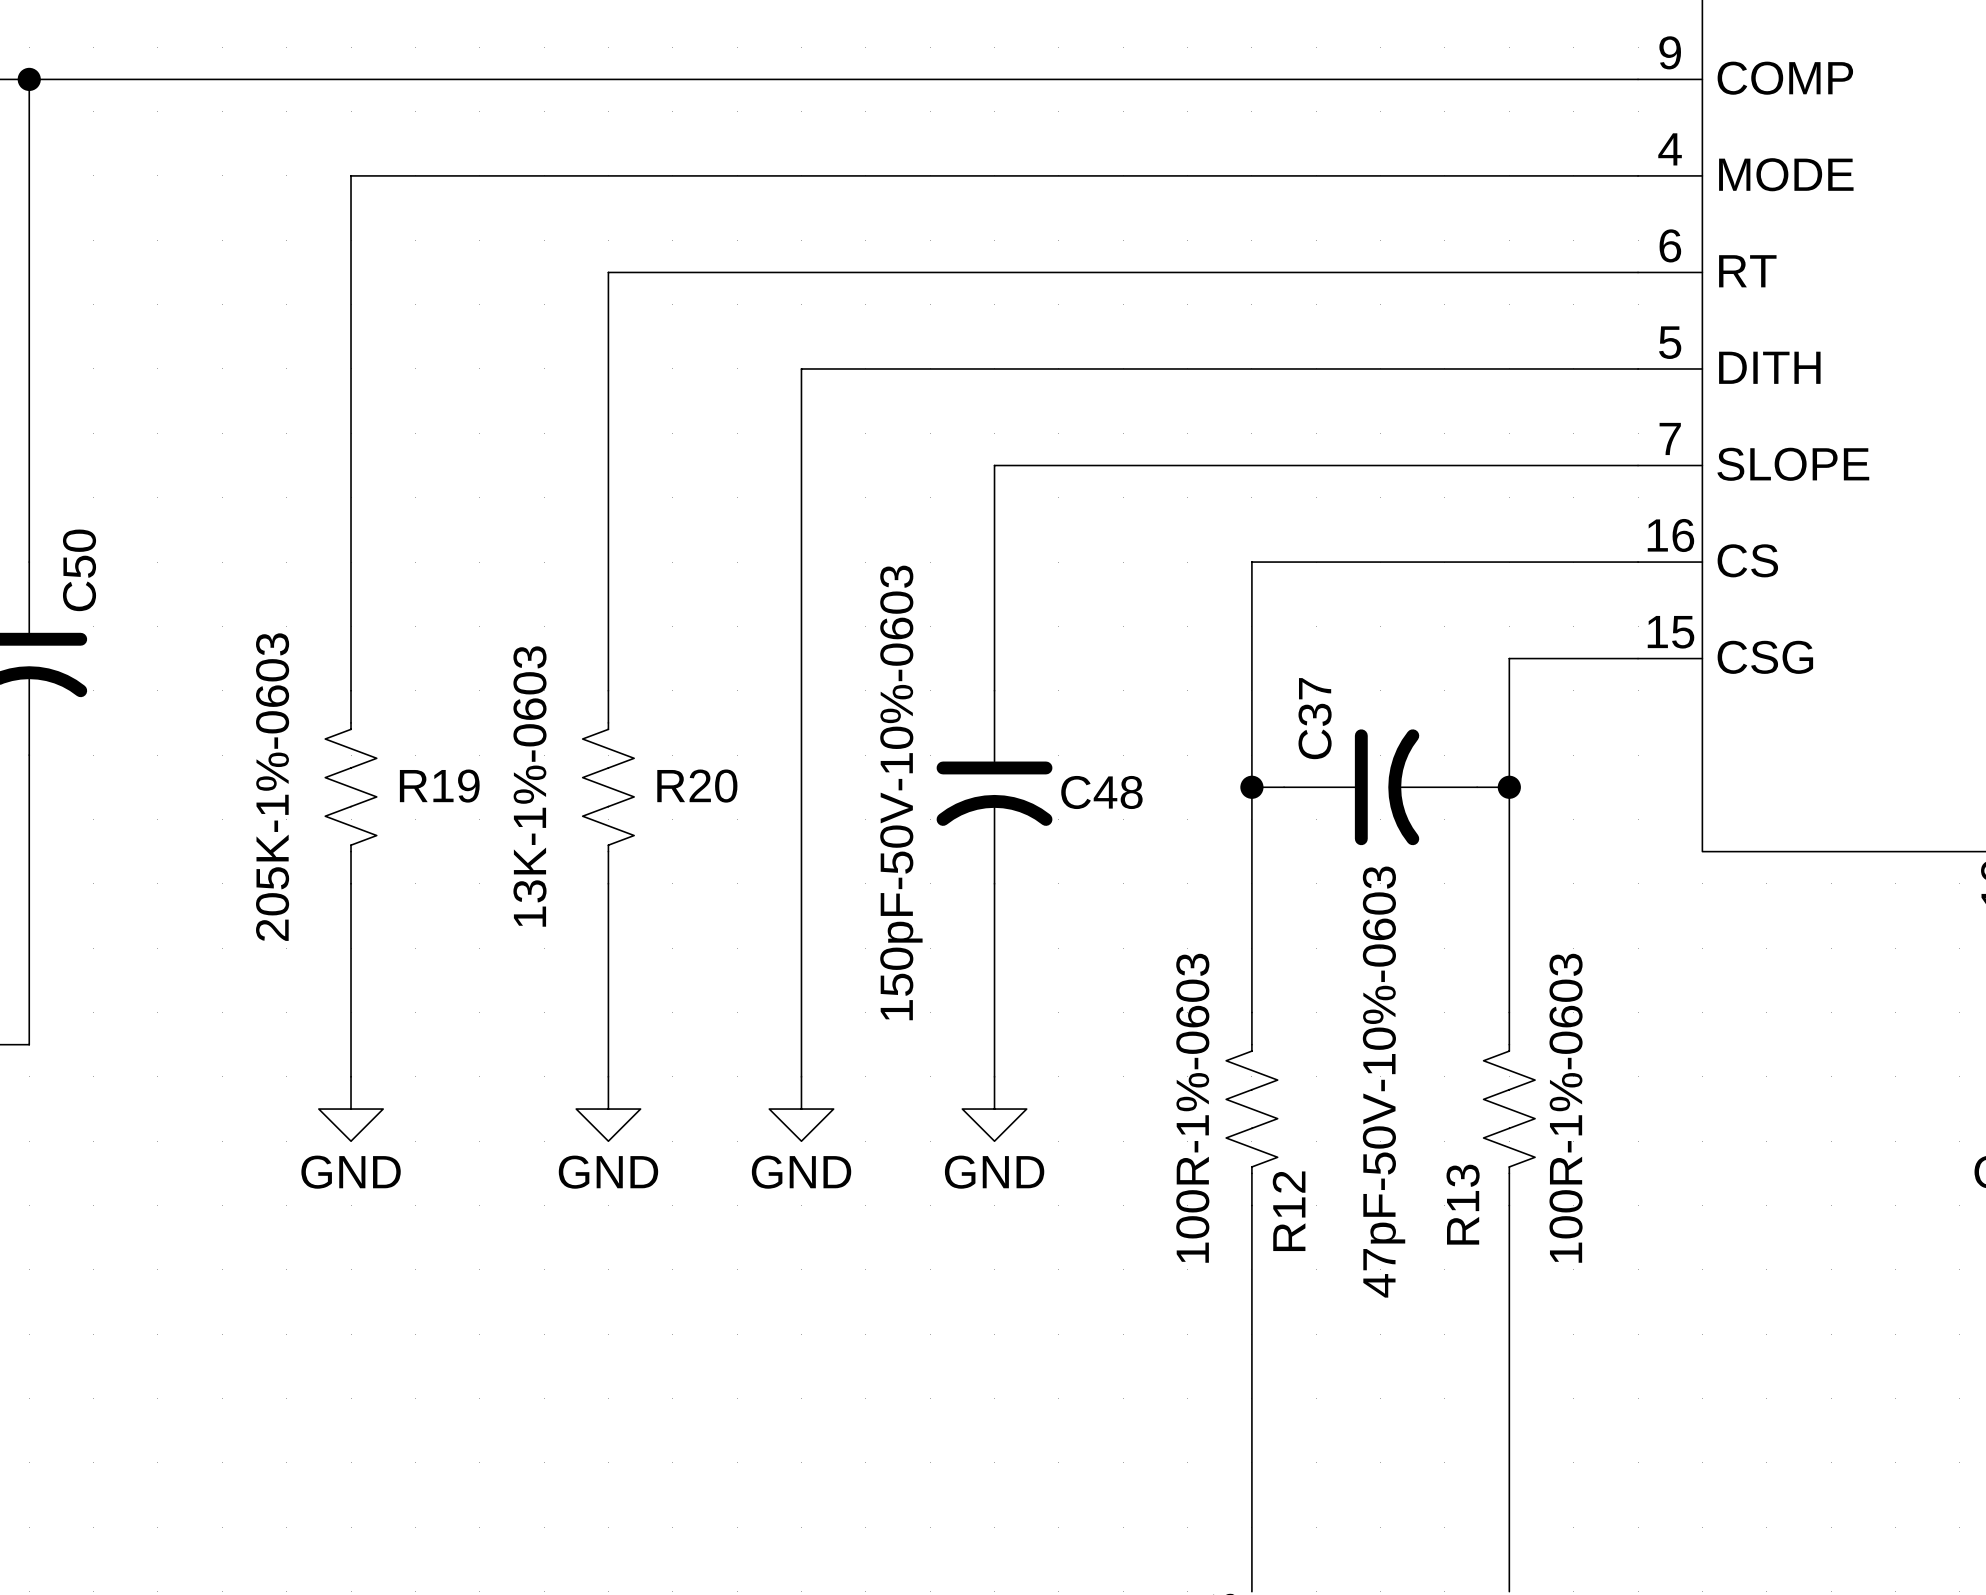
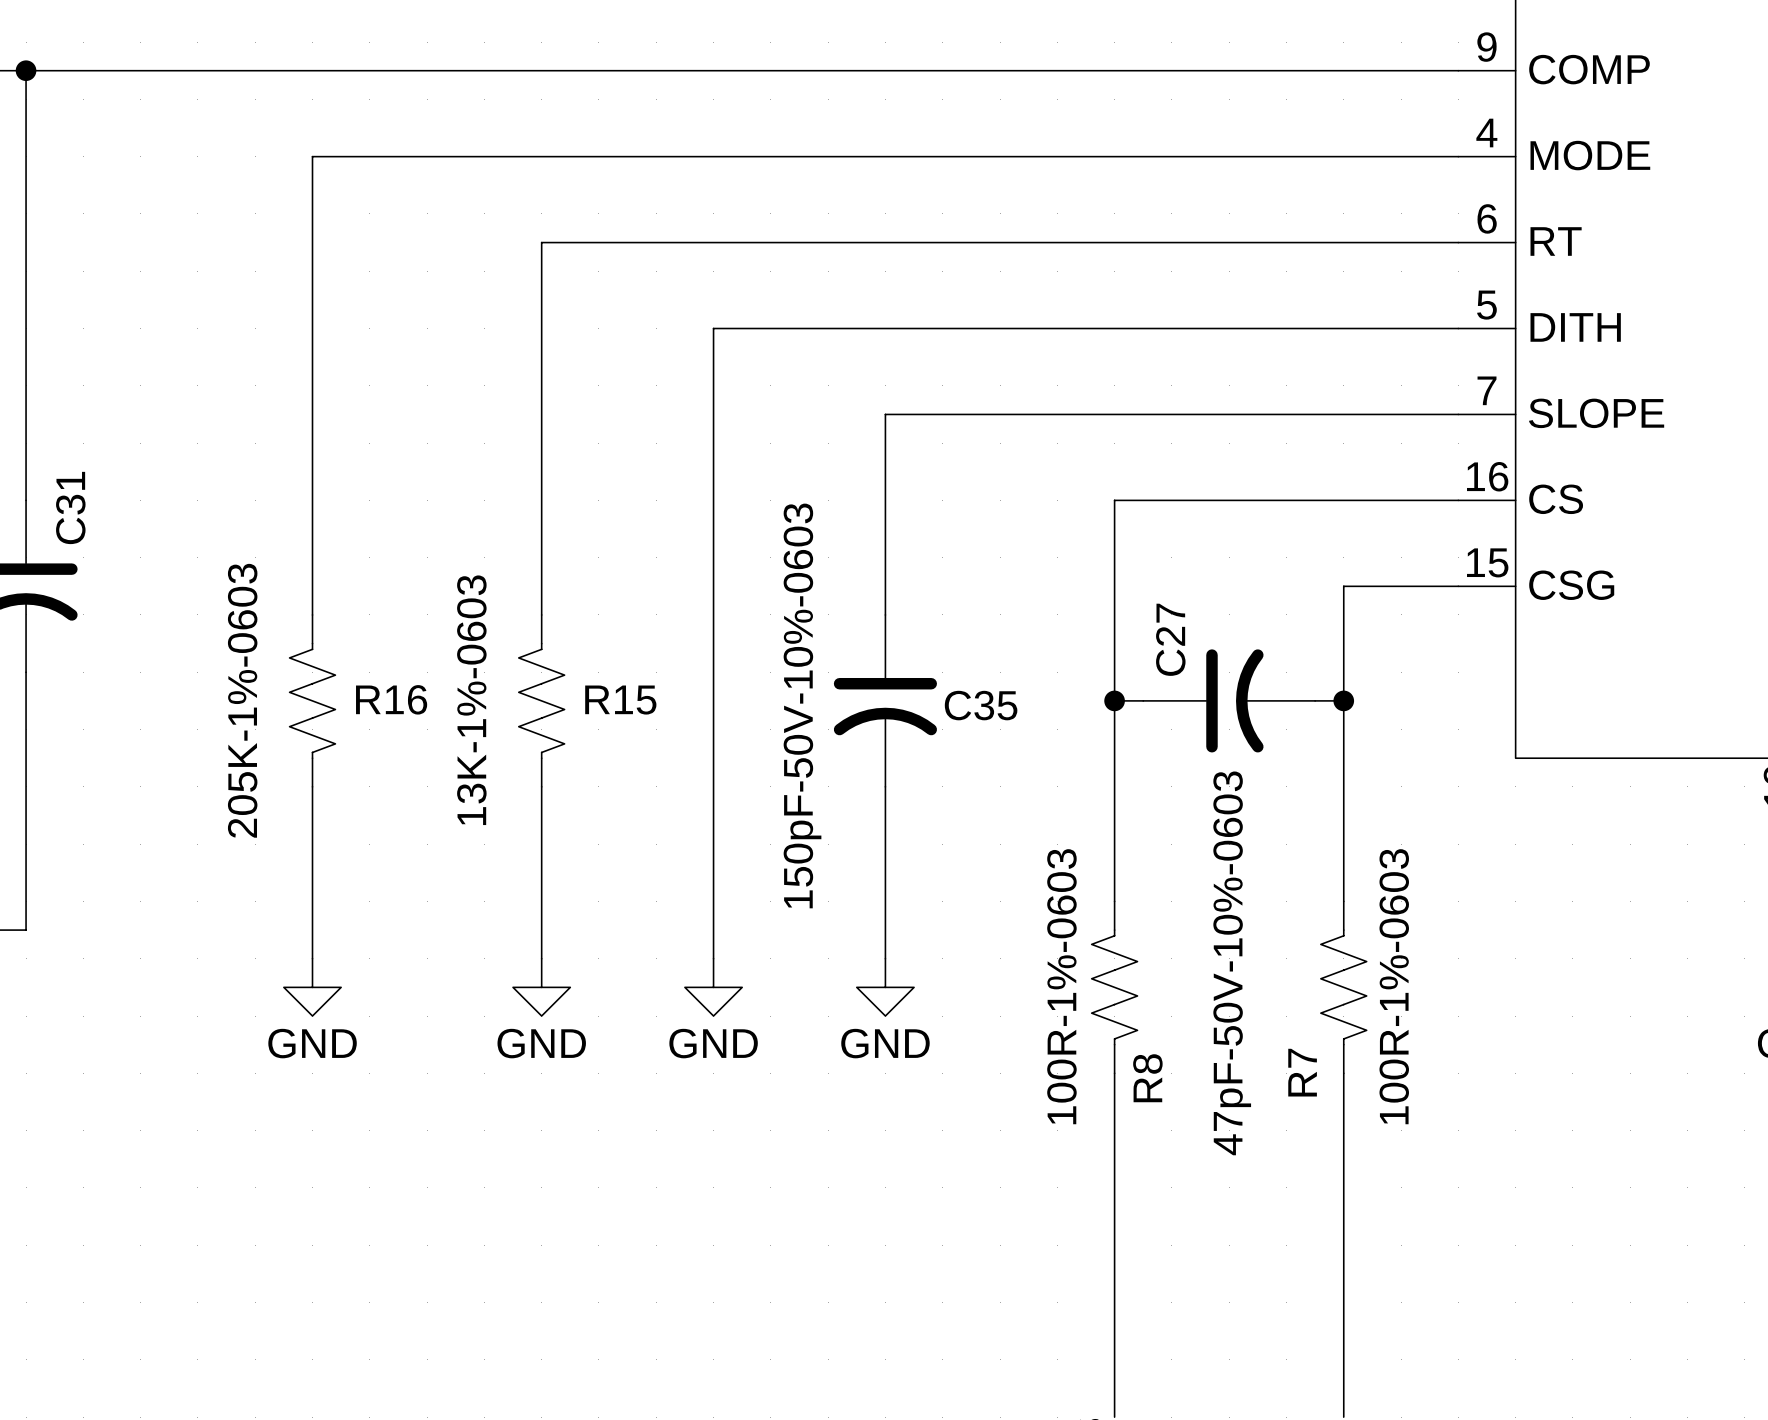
C50 name: C50 (79, 570) -> C31 (70, 507)
C37 name: C37 (1315, 718) -> C27 (1170, 639)
R19 name: R19 (439, 786) -> R16 (391, 699)
R20 name: R20 (697, 786) -> R15 (620, 700)
C48 name: C48 (1101, 792) -> C35 (981, 705)
R13 name: R13 (1463, 1204) -> R7 (1302, 1072)
R12 name: R12 (1289, 1211) -> R8 (1147, 1078)

